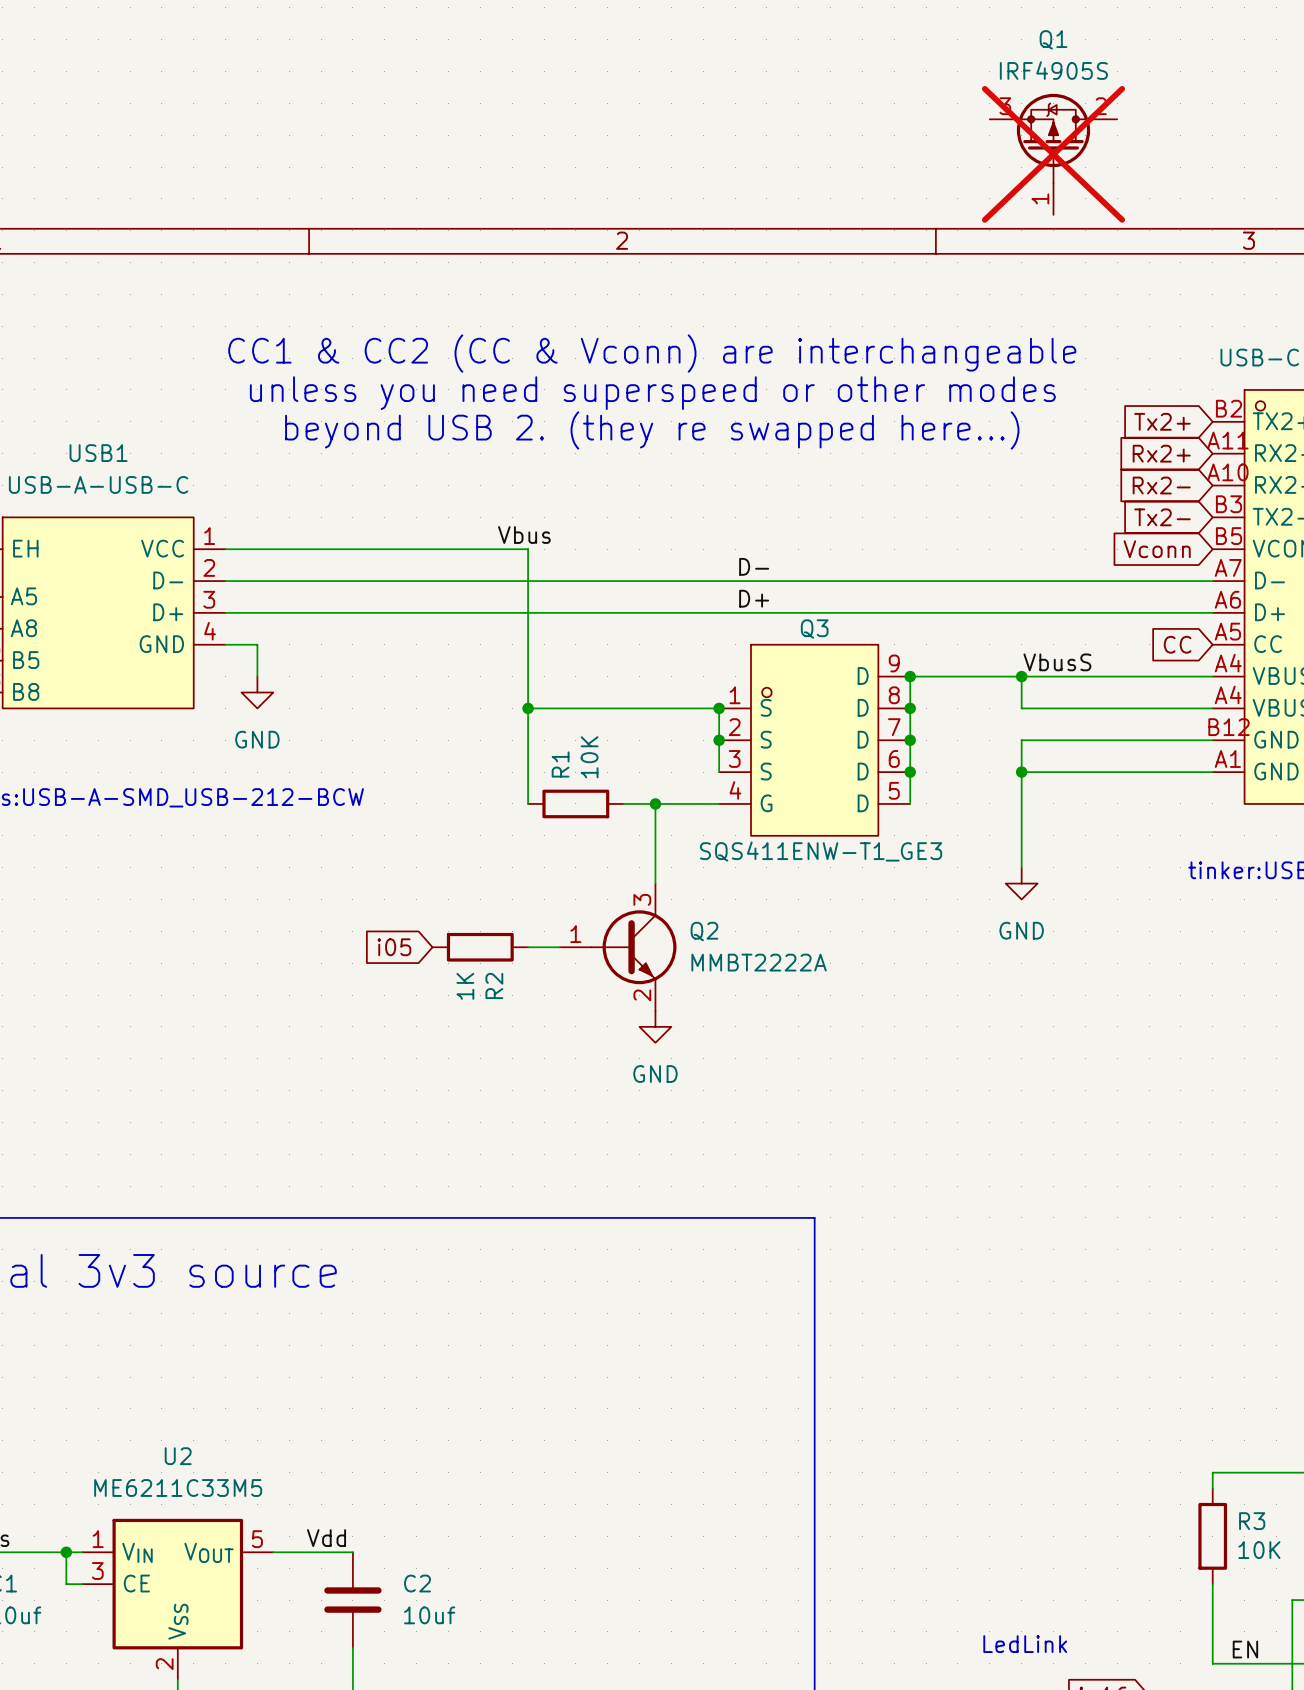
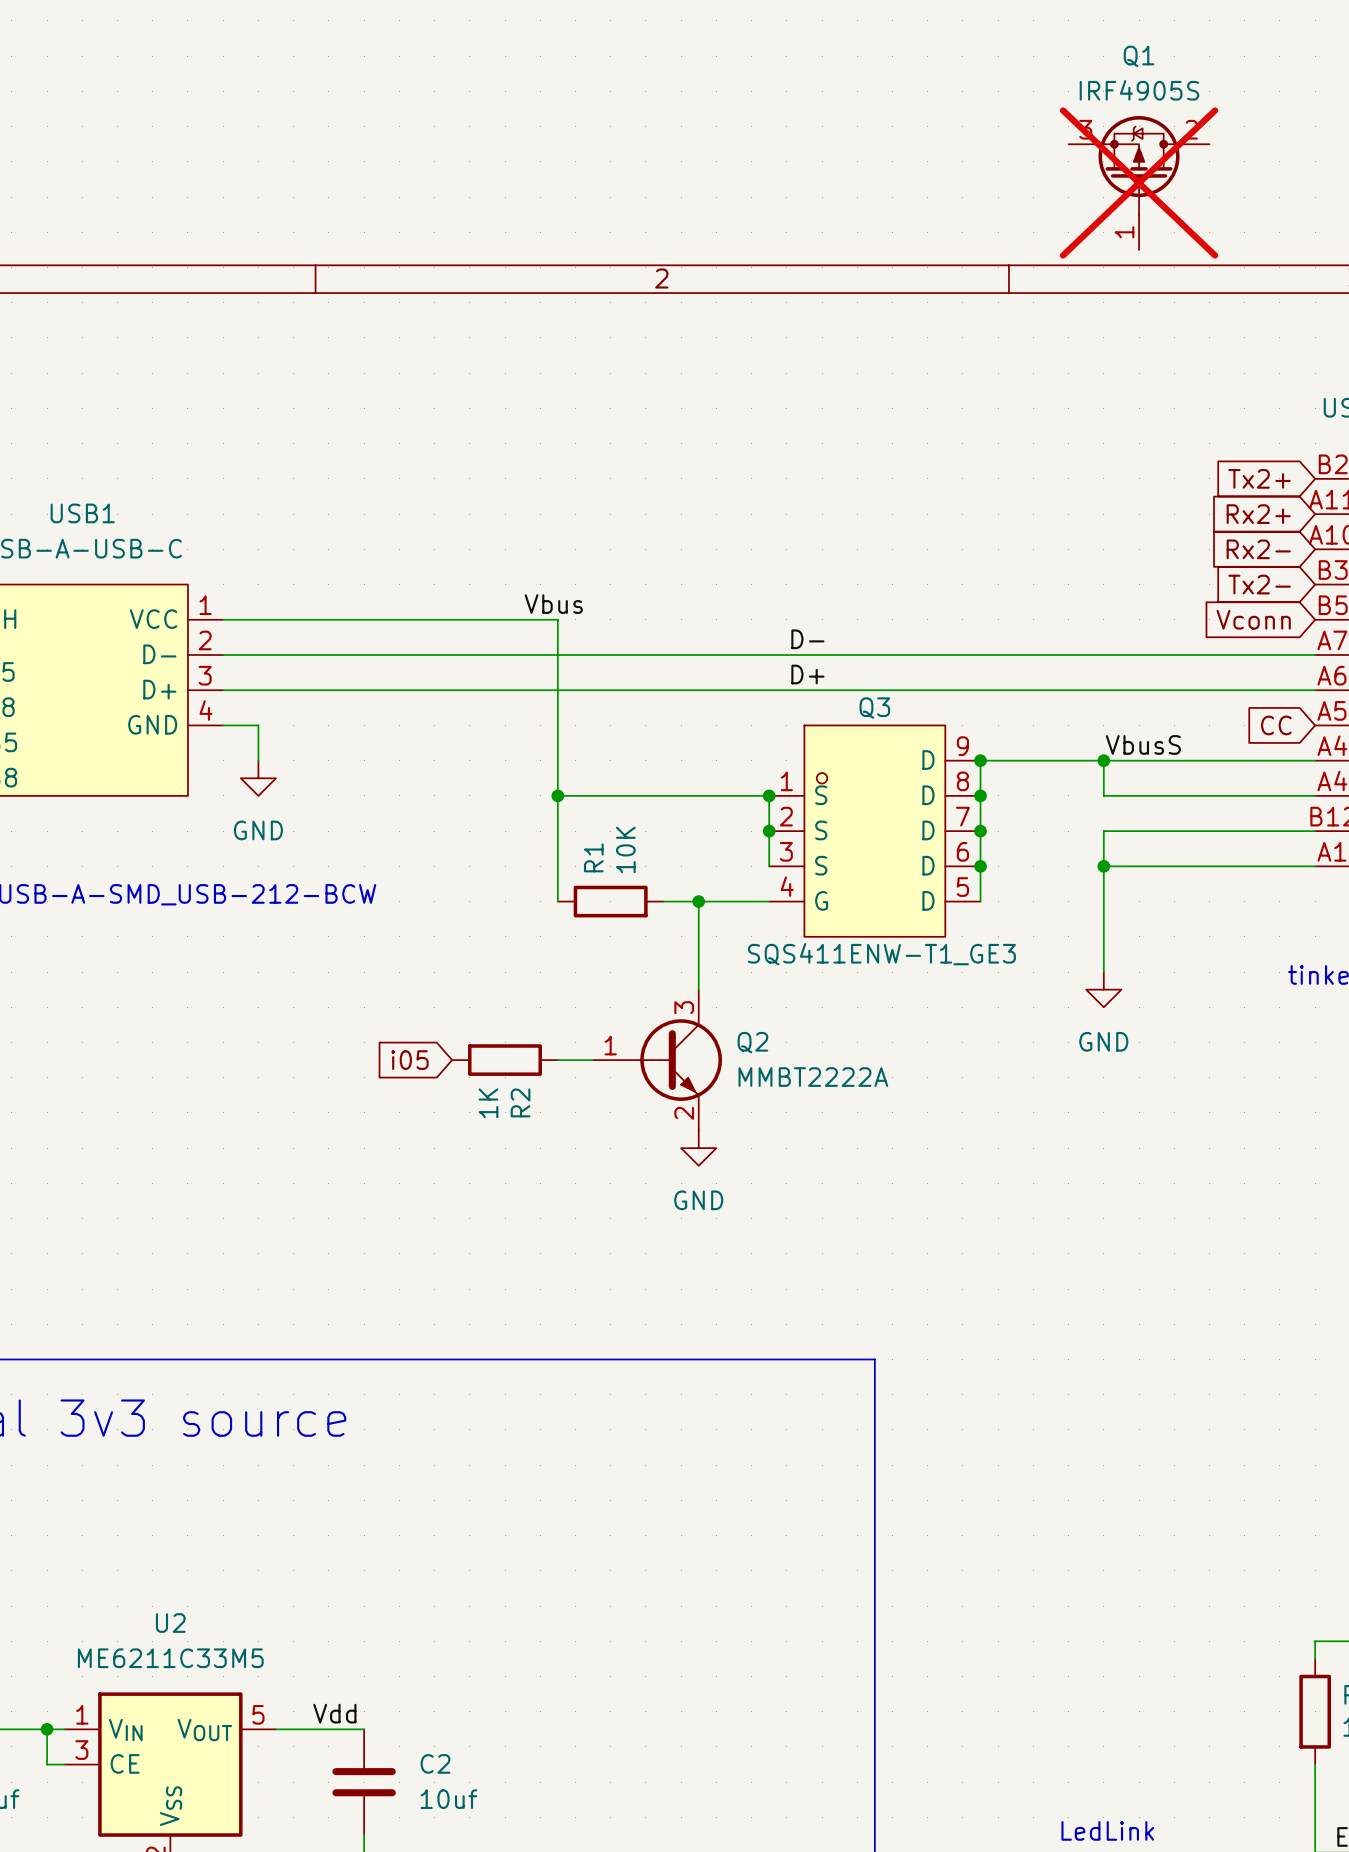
text: CC1 & CC2 (CC & Vconn) are interchangeable (652, 353) -> none
text: unless you need superspeed or other modes (652, 393) -> none
text: beyond USB 2. (they re swapped here...) (652, 430) -> none

